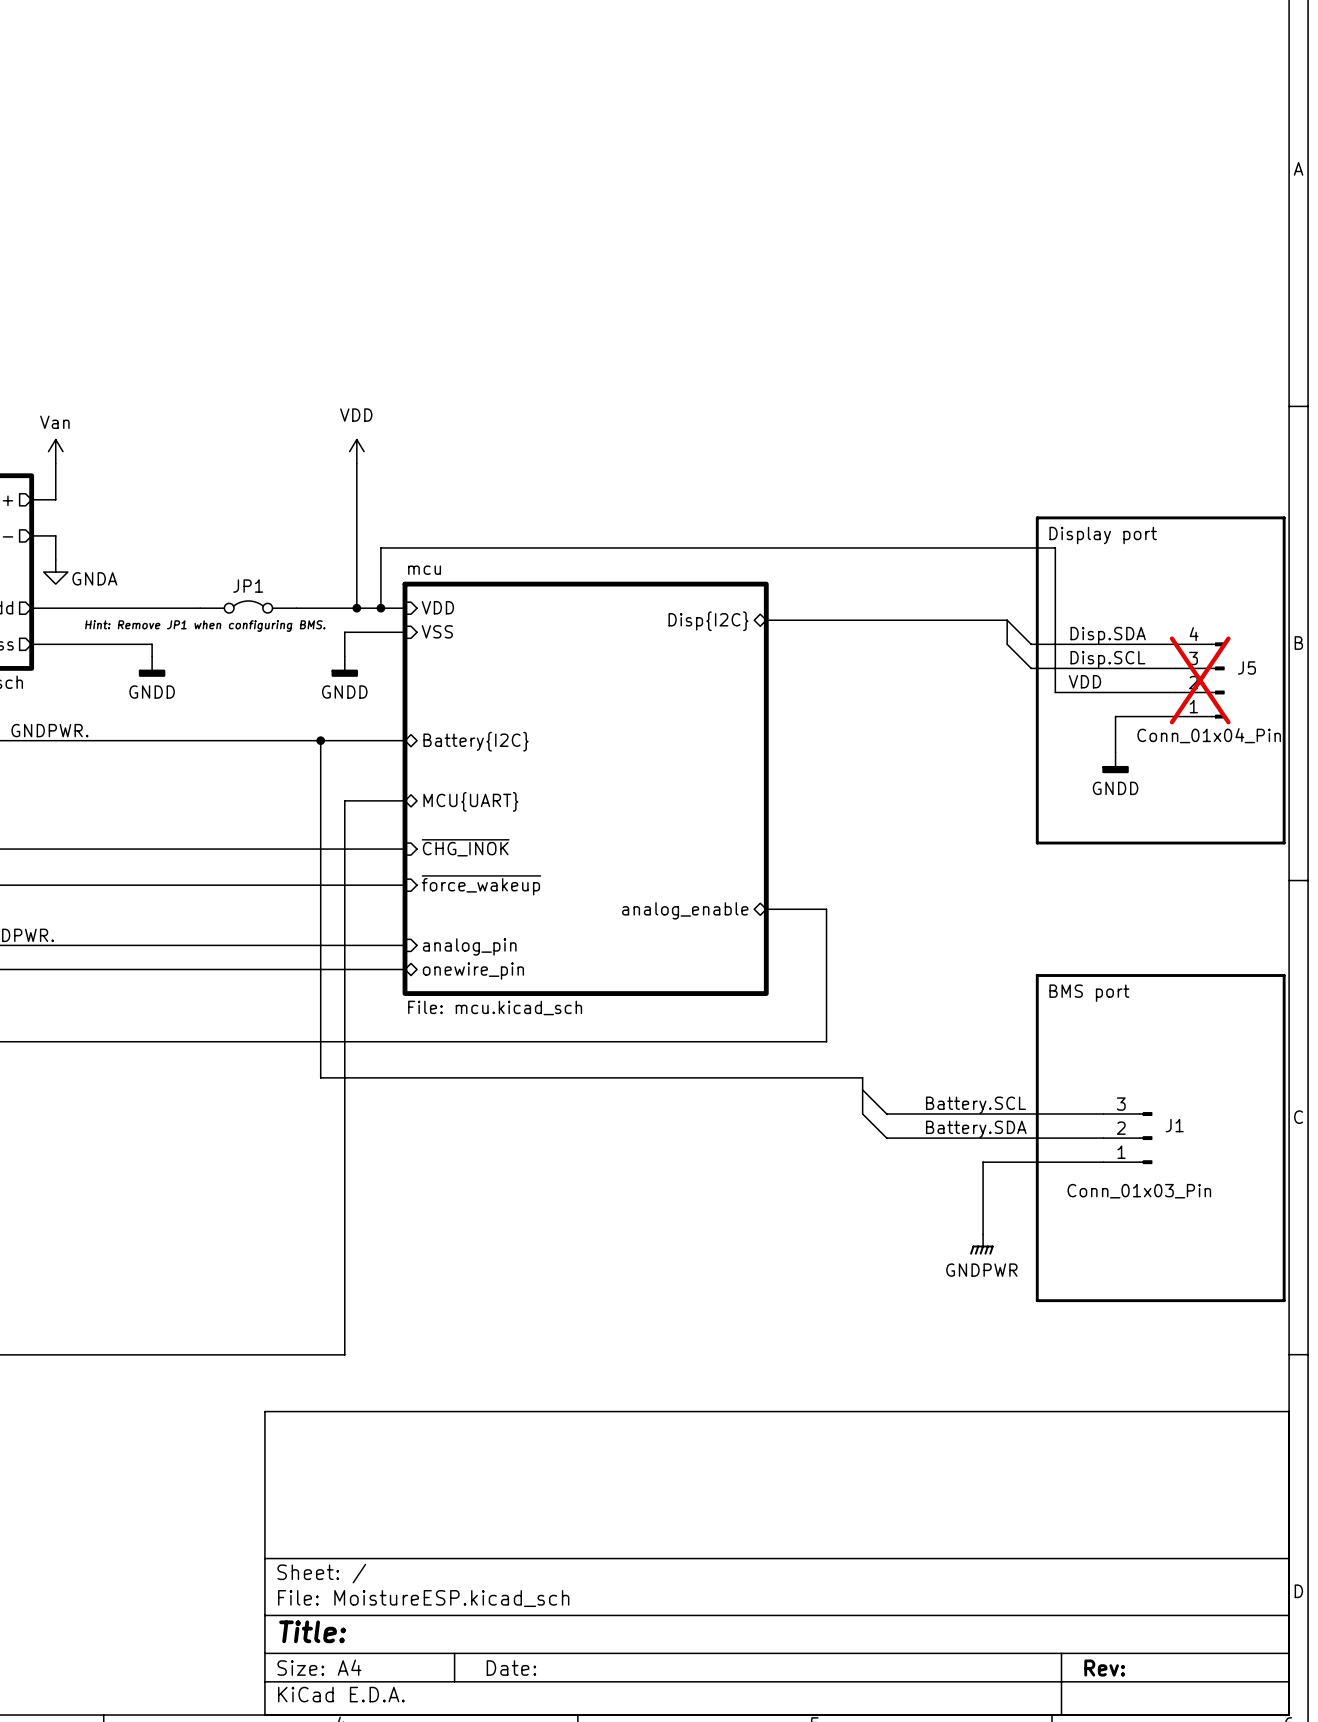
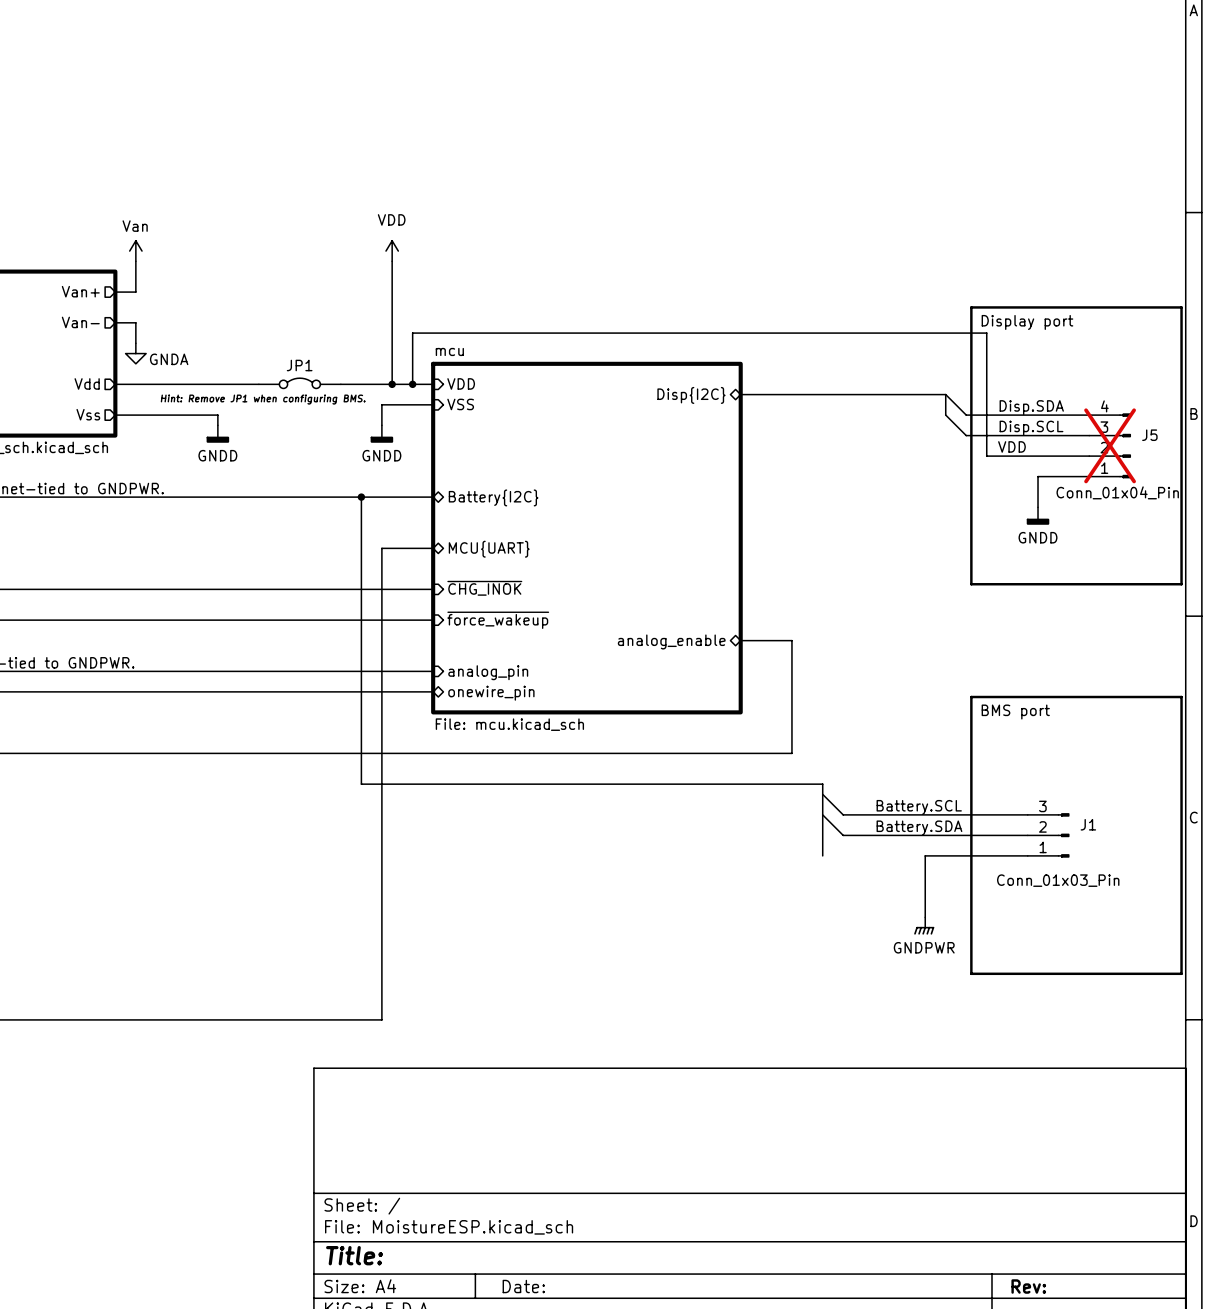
bus: none -> (822, 814) (822, 855)

